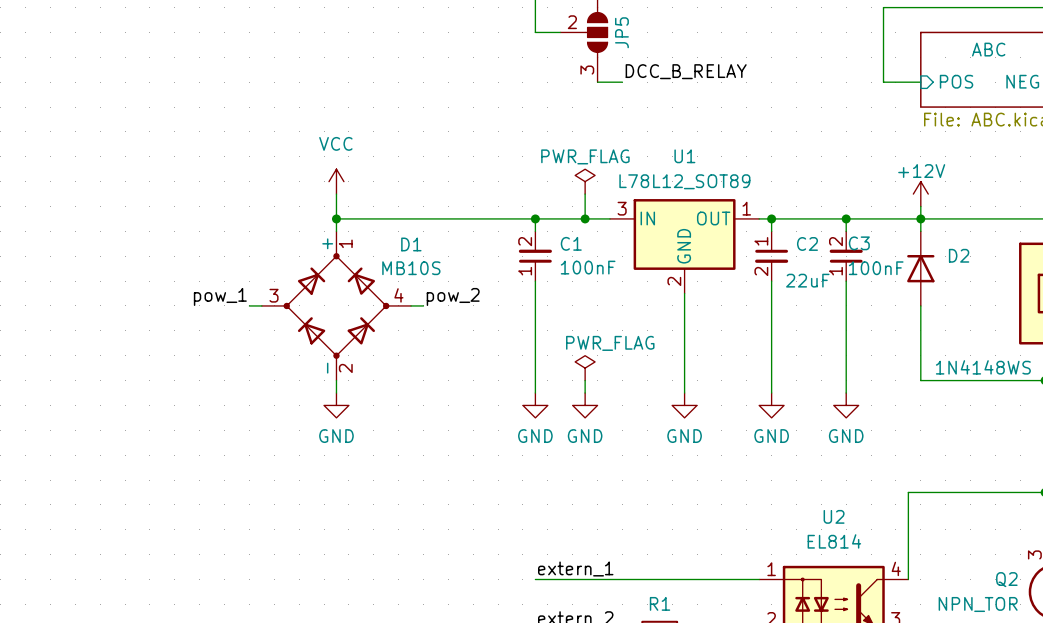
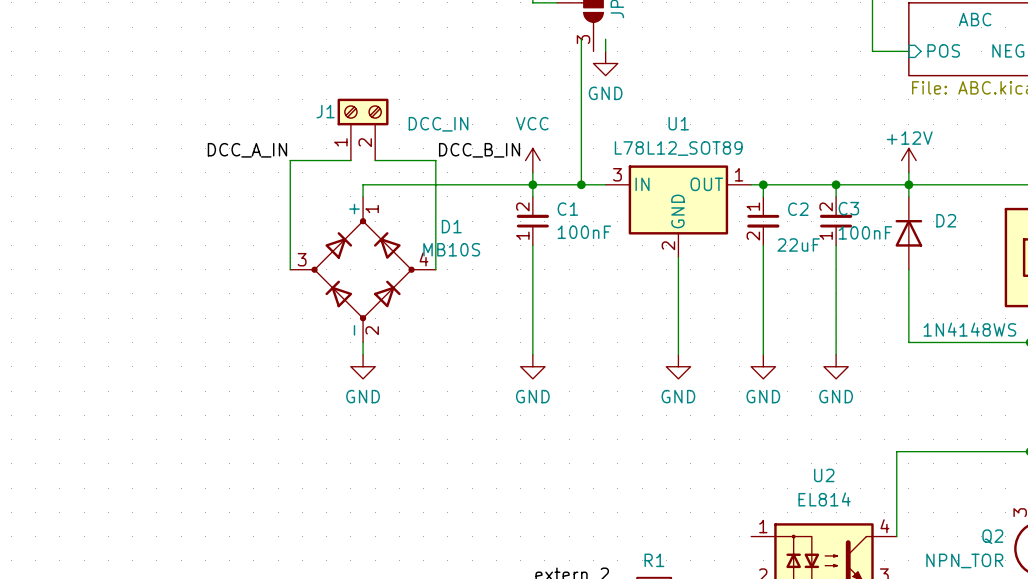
wire: none -> (581, 39) (581, 160)
wire: none -> (605, 39) (605, 51)
label: DCC_B_RELAY (686, 71) -> none
wire: (597, 82) (622, 82) -> none
power symbol: none -> GND (605, 63)
J1: none -> DCC_IN (363, 129)
power symbol position: VCC (336, 181) -> VCC (532, 160)
power symbol: PWR_FLAG (585, 181) -> none
label: none -> DCC_A_IN (247, 150)
label: none -> DCC_B_IN (479, 150)
wire: (336, 194) (336, 231) -> none
wire: none -> (350, 160) (290, 160) (290, 269)
wire: none -> (375, 160) (435, 160) (435, 269)
wire: (336, 218) (361, 218) -> (363, 196) (363, 184)
junction: (336, 218) -> none
D1 name position: D1 (411, 244) -> D1 (451, 226)
D1 value position: MB10S (411, 268) -> MB10S (451, 249)
label: pow_1 (220, 296) -> none
label: pow_2 (453, 296) -> none
wire: (249, 305) (261, 305) -> none
D1 position: (336, 305) -> (363, 269)
power symbol: PWR_FLAG (585, 368) -> none
wire: (336, 380) (336, 393) -> (363, 342) (363, 354)
wire: (585, 380) (585, 393) -> (532, 172) (532, 184)
power symbol position: GND (336, 405) -> GND (363, 366)
power symbol: GND (585, 405) -> none
label: extern_1 (575, 568) -> none
wire: (535, 579) (759, 579) -> none

